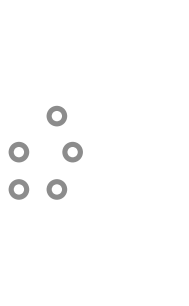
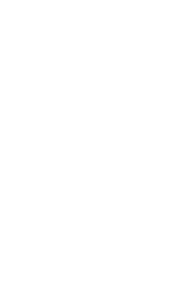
via: (56, 116) -> none
via: (18, 152) -> none
via: (72, 152) -> none
via: (18, 189) -> none
via: (56, 189) -> none

